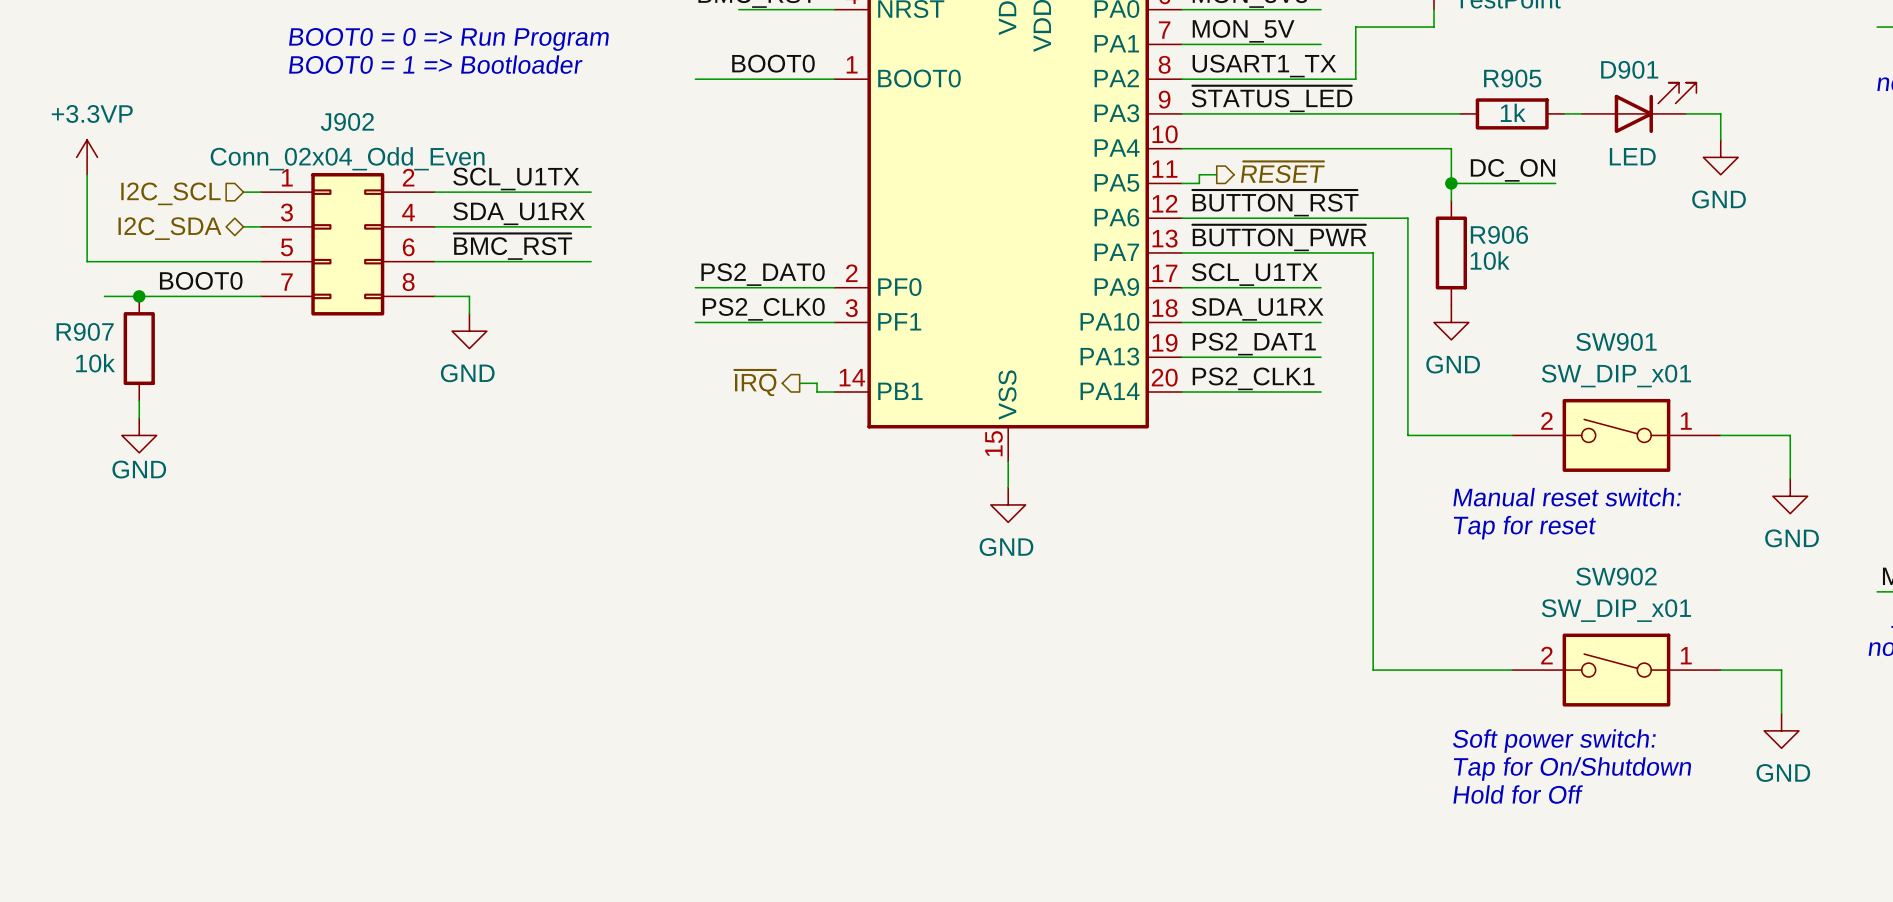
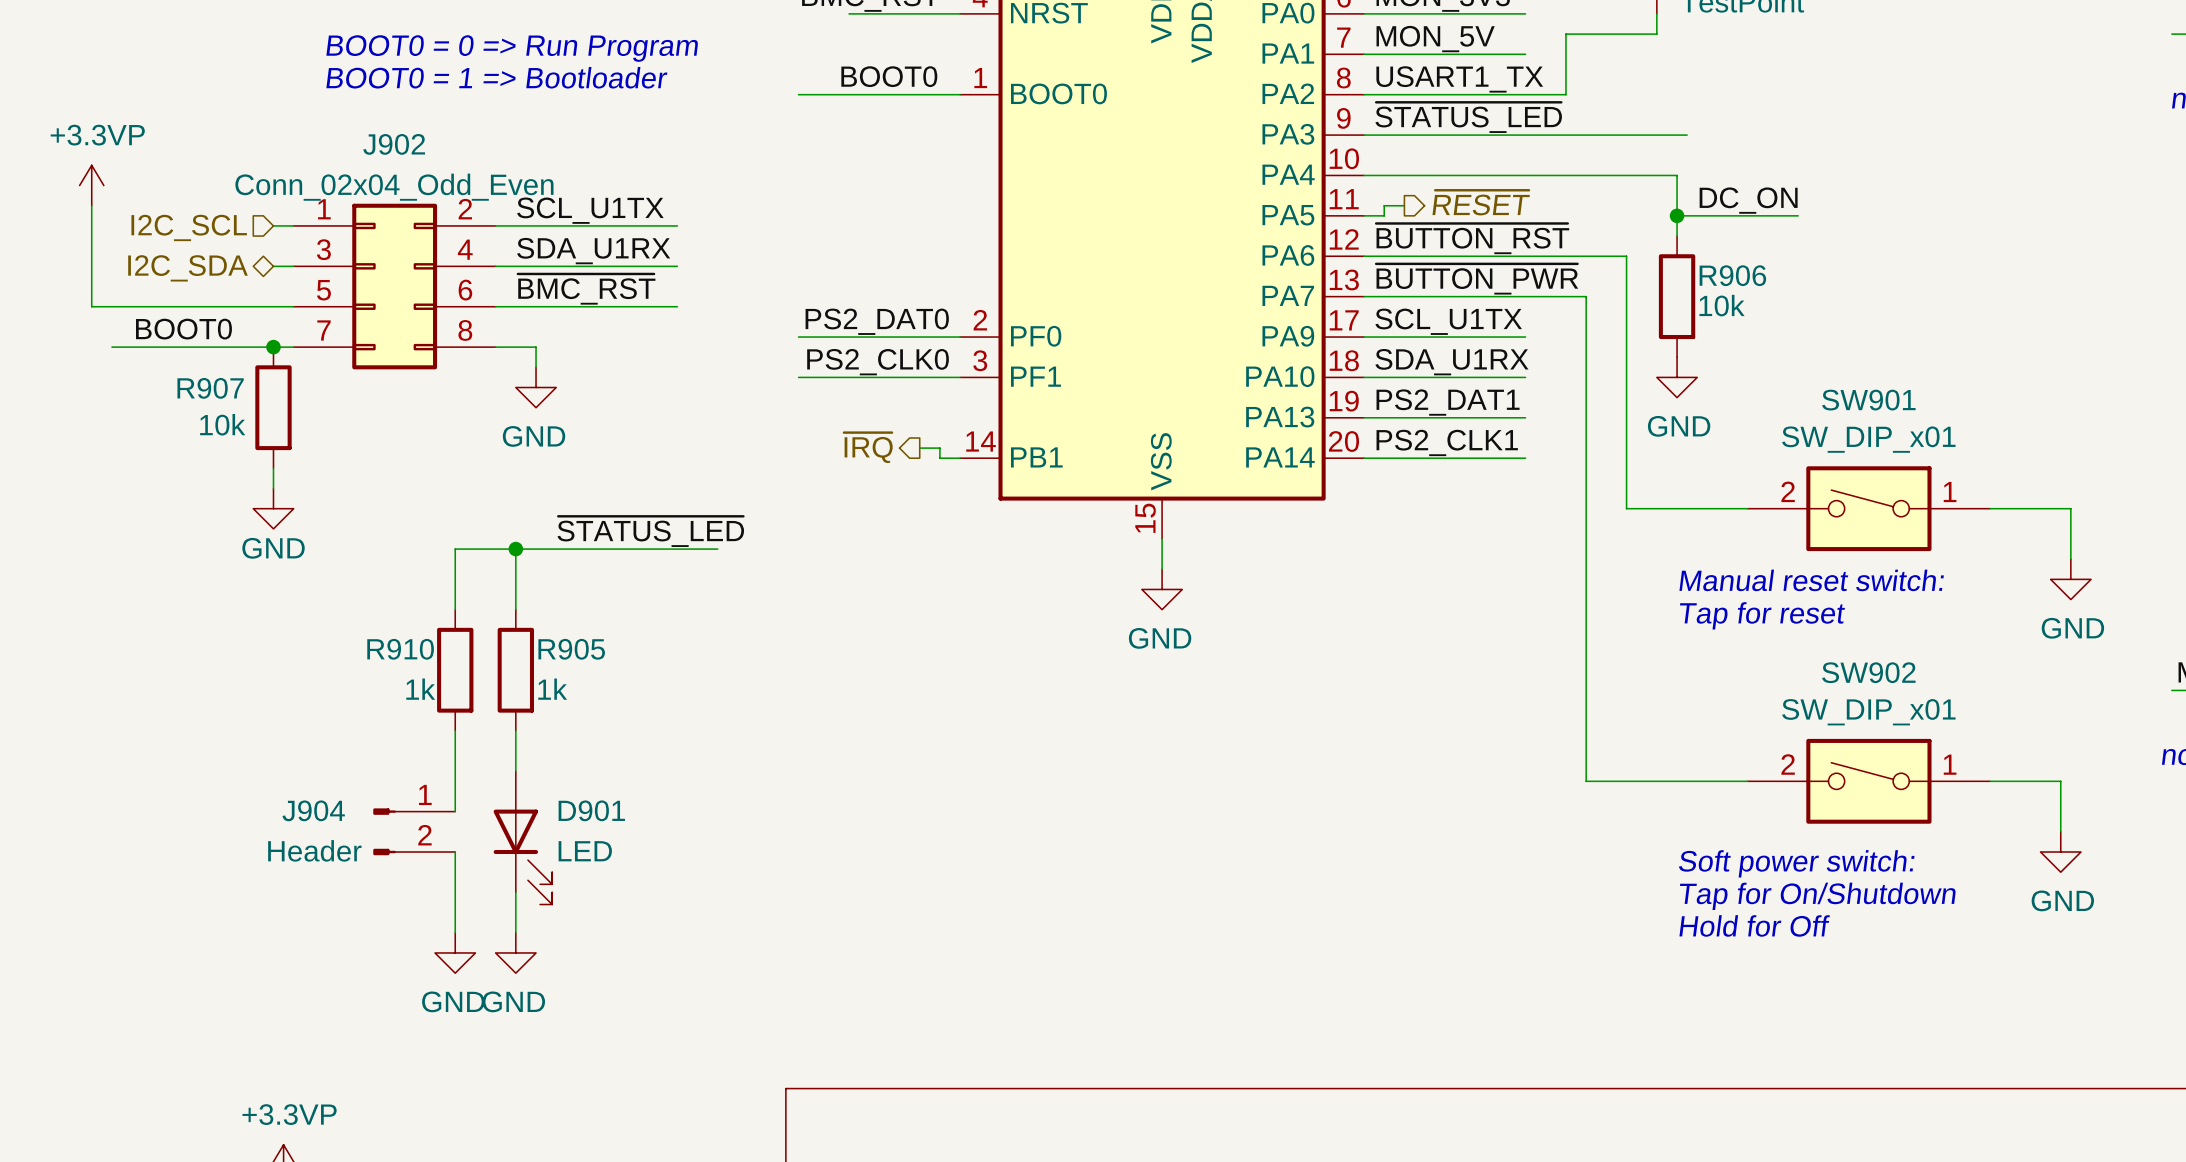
D901 name position: D901 (1629, 69) -> D901 (591, 810)
R905 name position: R905 (1512, 78) -> R905 (571, 649)
D901 position: (1639, 107) -> (522, 837)
D901 rotation: 0° (1655, 107) -> 90° clockwise (522, 857)
R905 value position: 1k (1513, 112) -> 1k (552, 689)
R905 rotation: 0° (1512, 113) -> 90° clockwise (515, 670)
R905 position: (1512, 113) -> (515, 670)
wire: (1564, 113) (1581, 113) -> none
wire: (1685, 113) (1720, 113) (1720, 140) -> none
D901 value position: LED (1632, 156) -> LED (585, 851)
power symbol: GND (1720, 157) -> none
label position: BOOT0 (201, 280) -> BOOT0 (183, 329)
junction: (139, 296) -> none
junction: none -> (273, 347)
R907 position: (139, 348) -> (273, 407)
wire: (139, 400) (139, 418) -> (273, 468) (273, 488)
power symbol position: GND (139, 435) -> GND (273, 508)
label: none -> ~{STATUS_LED} (650, 531)
wire: none -> (515, 549) (515, 609)
junction: none -> (515, 549)
wire: none -> (717, 549) (455, 549) (455, 609)
R910: none -> 1k (455, 670)
wire: none -> (455, 730) (455, 811)
wire: none -> (515, 730) (515, 771)
J904: none -> Header (414, 831)
wire: none -> (455, 852) (455, 932)
wire: none -> (515, 892) (515, 932)
power symbol: none -> GND (455, 952)
power symbol: none -> GND (515, 952)

